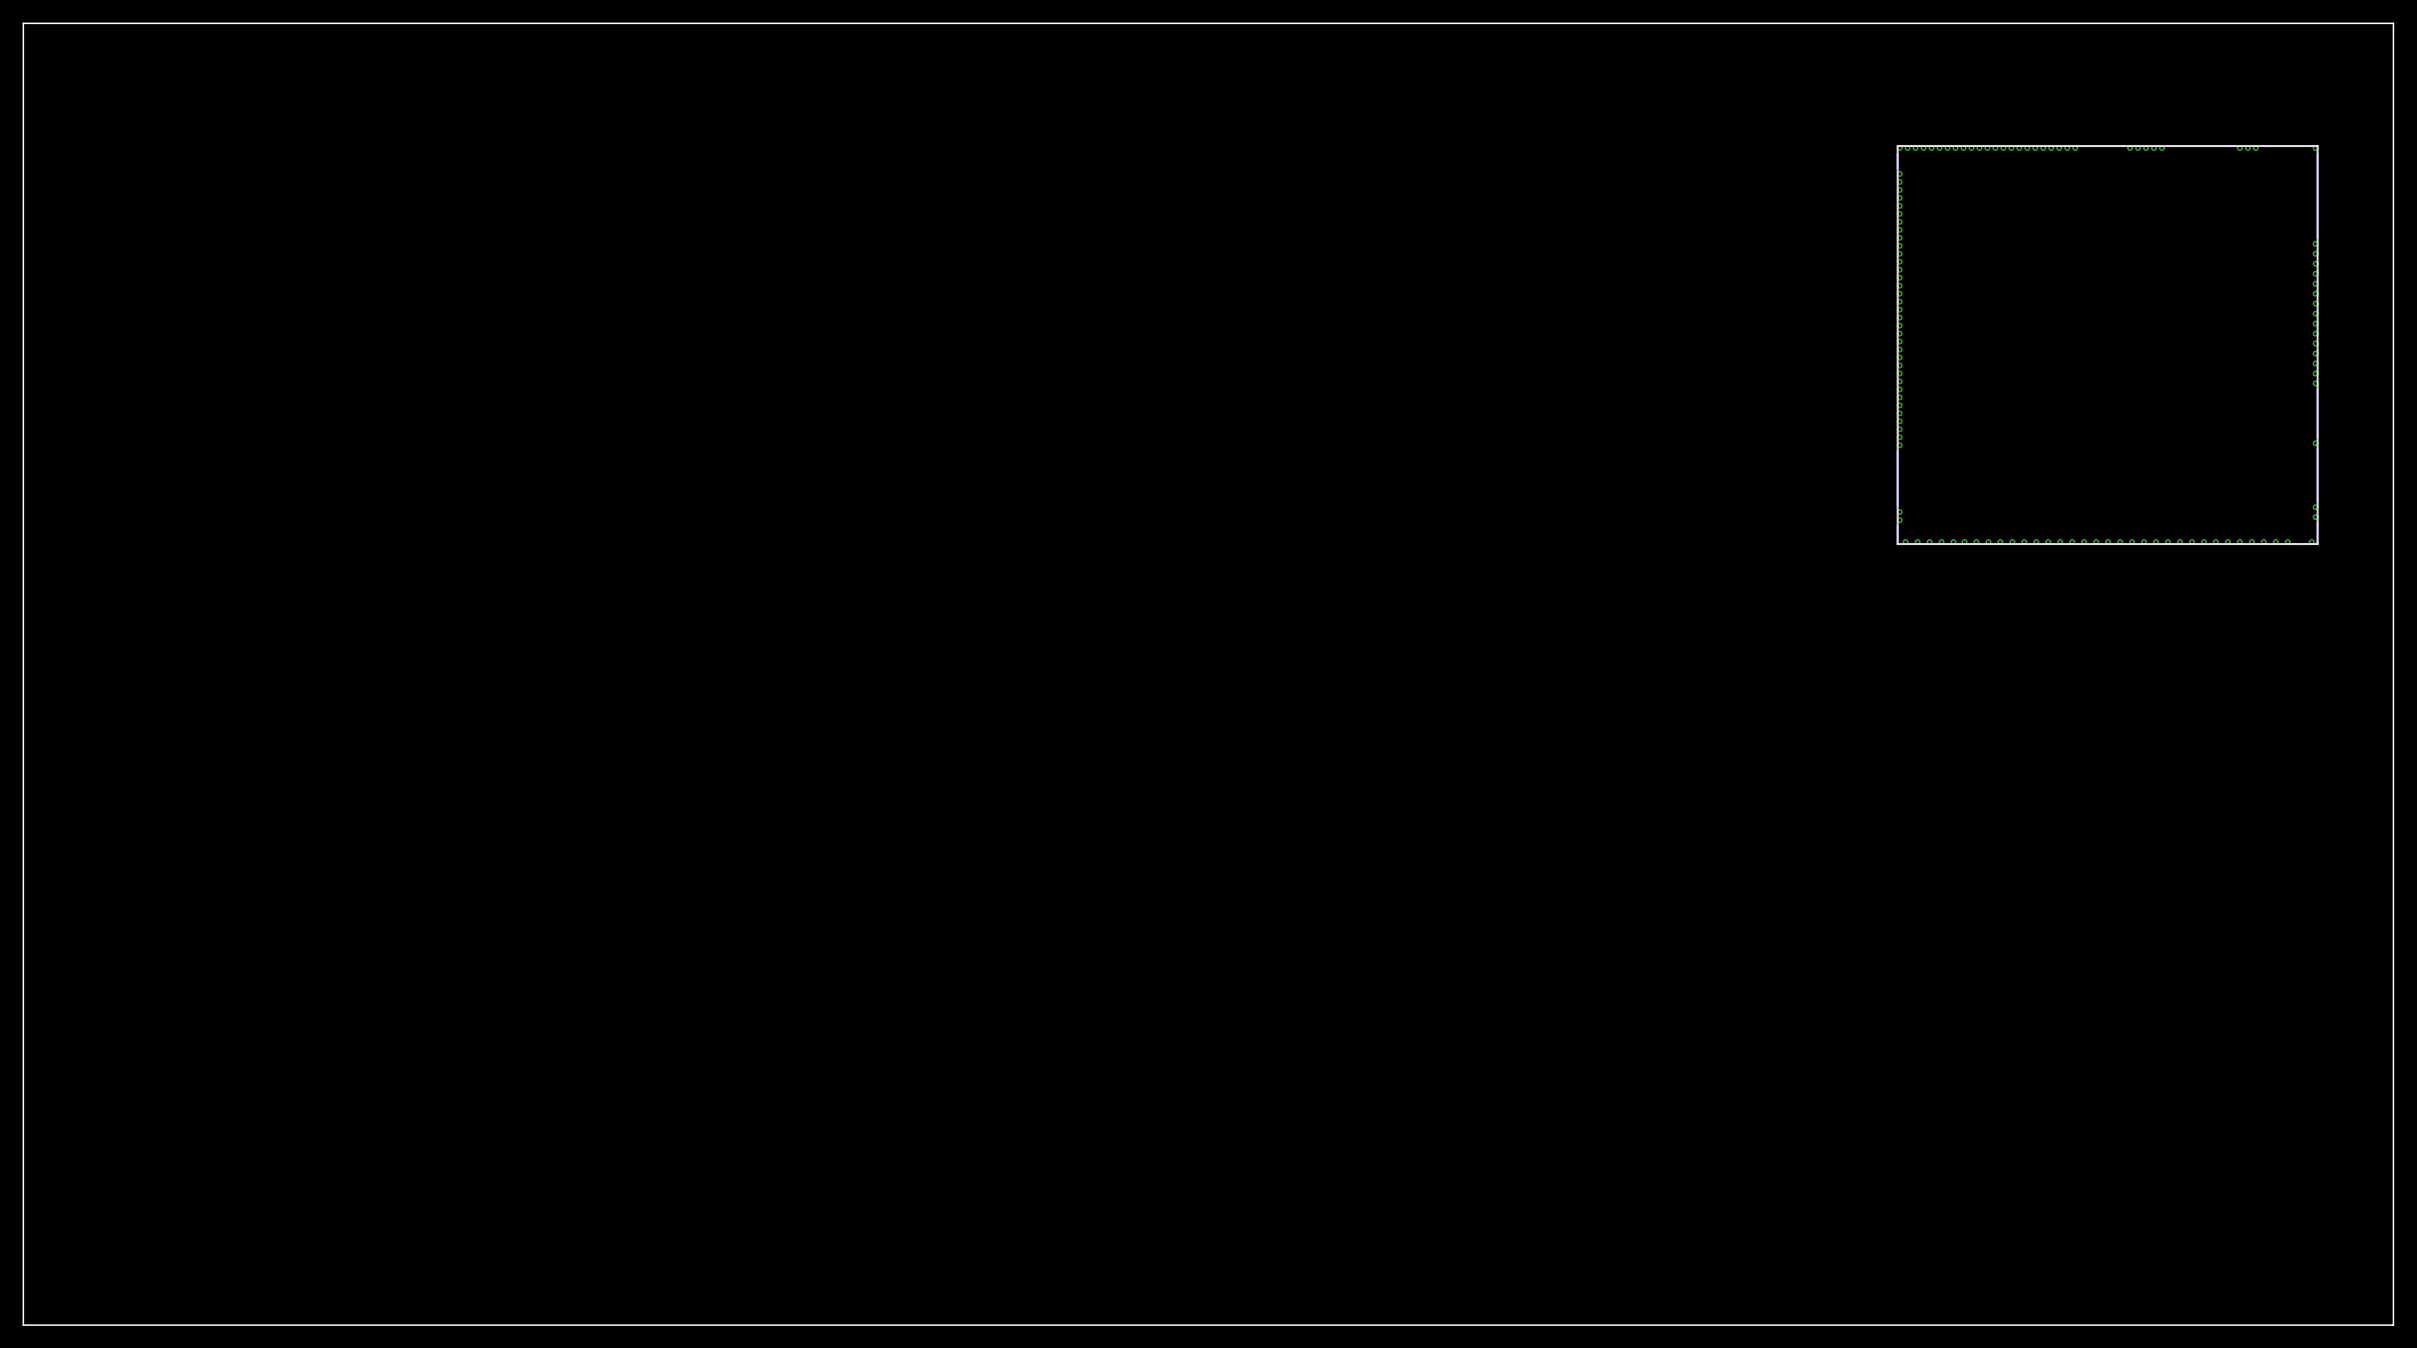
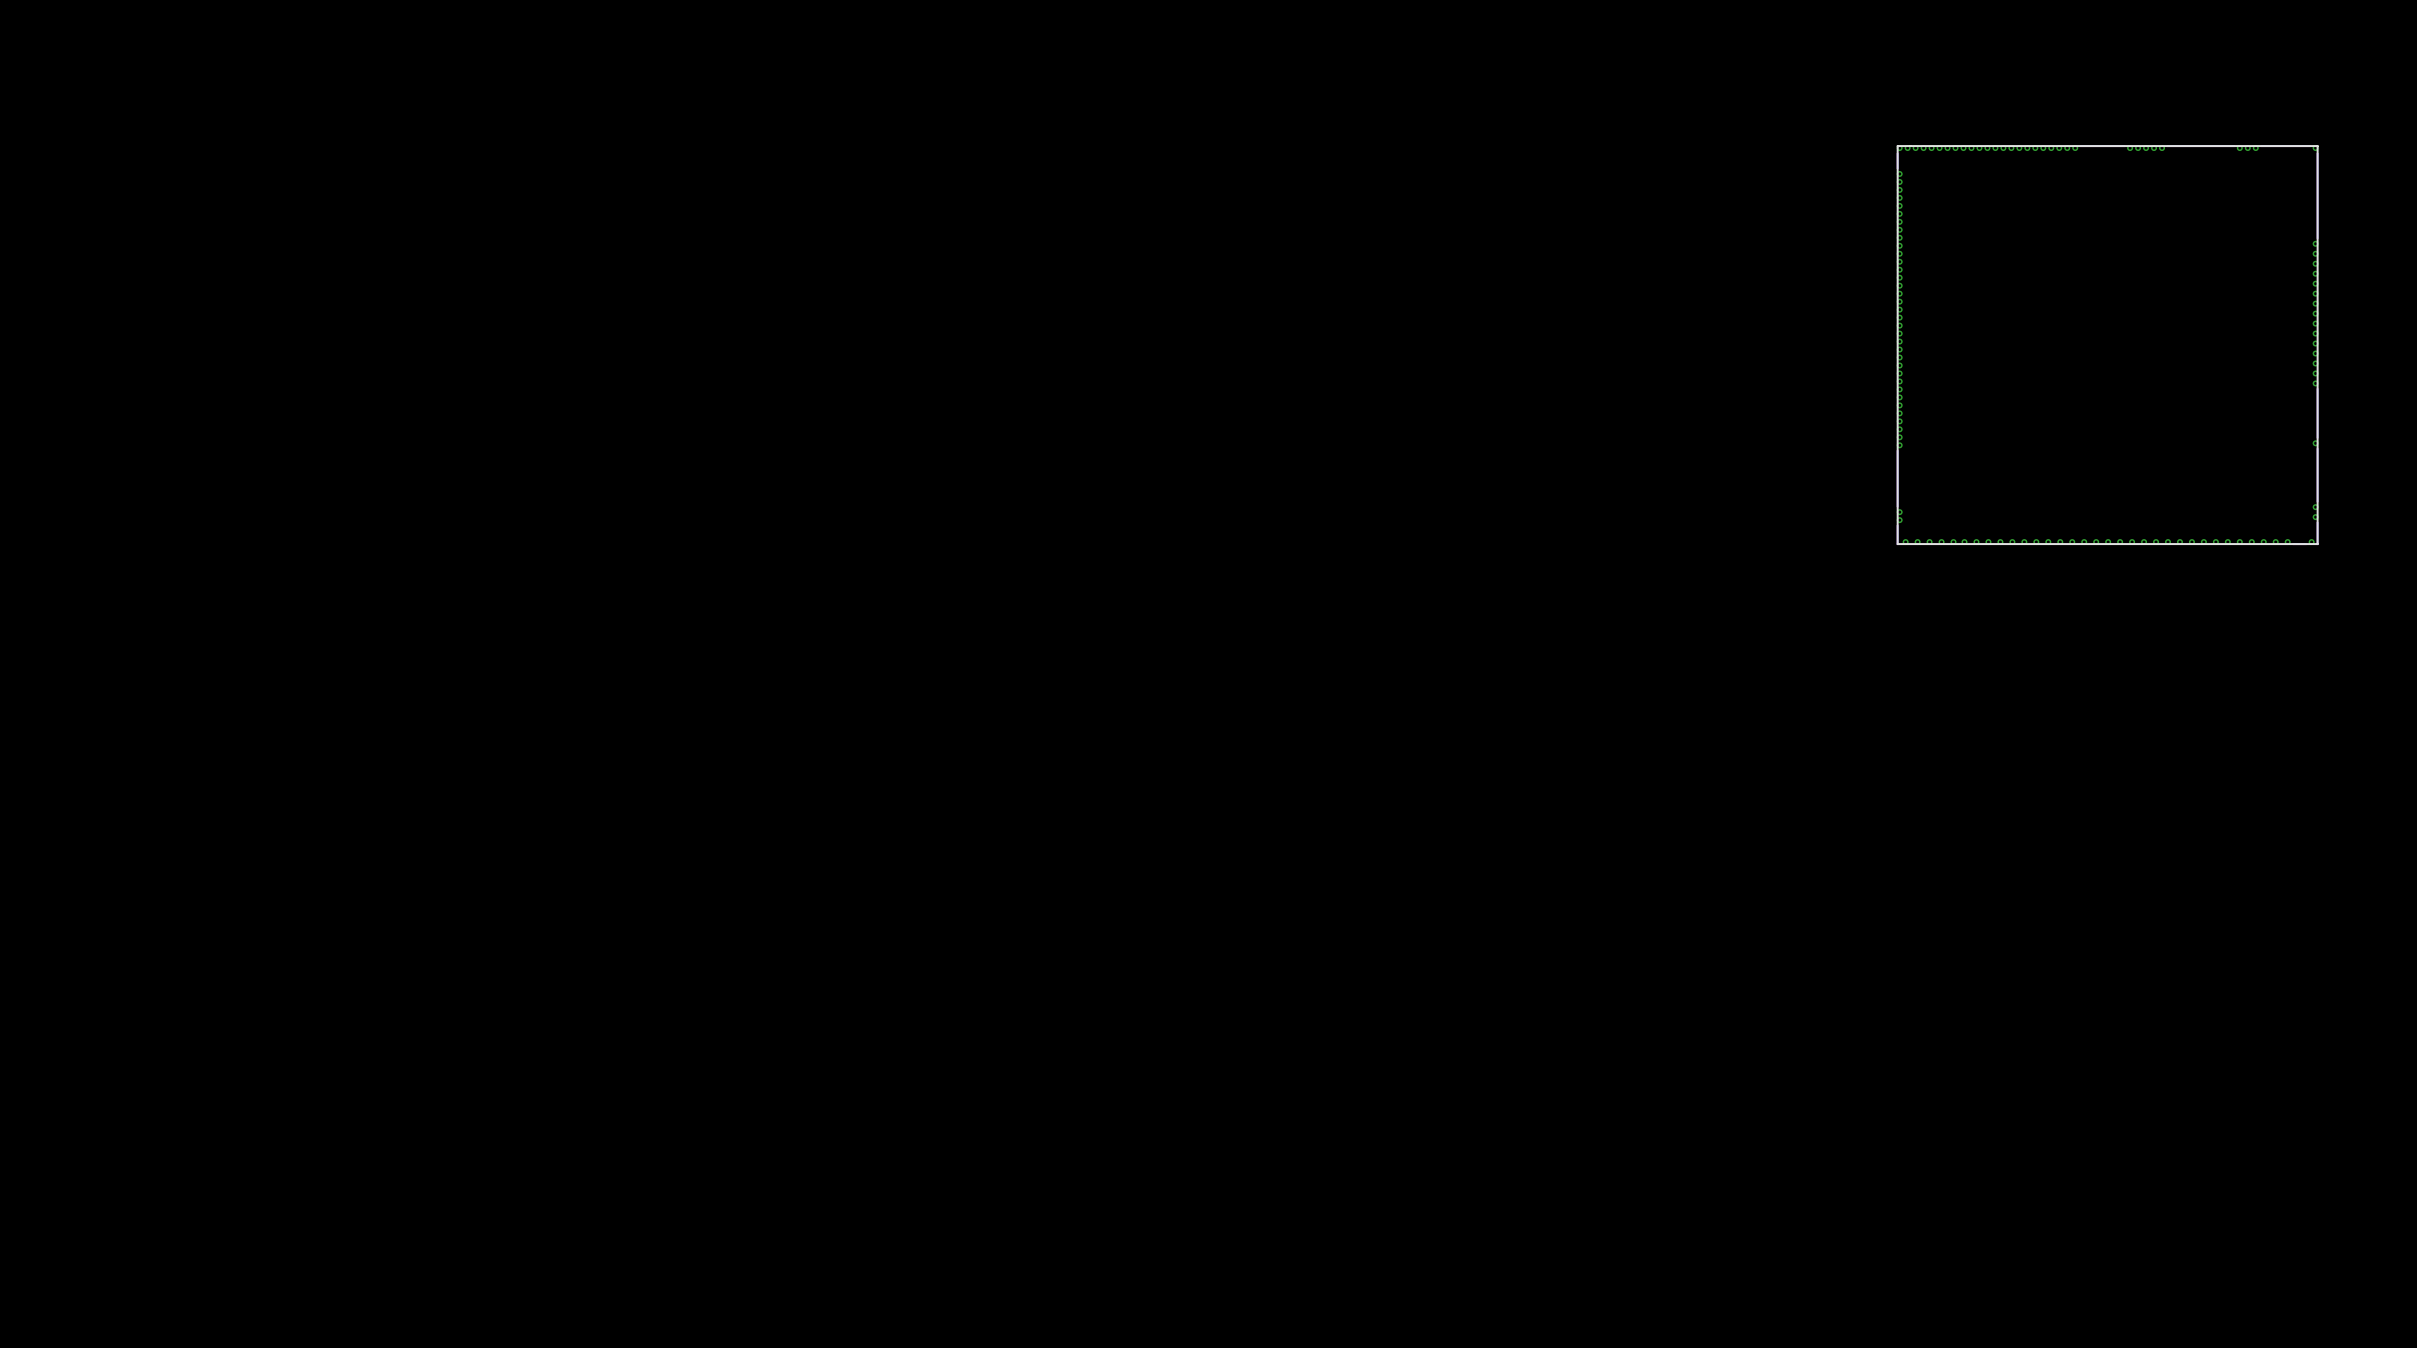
board edge: (2393, 23) (23, 23) (23, 1325) (2393, 1325) (2393, 23) -> none

